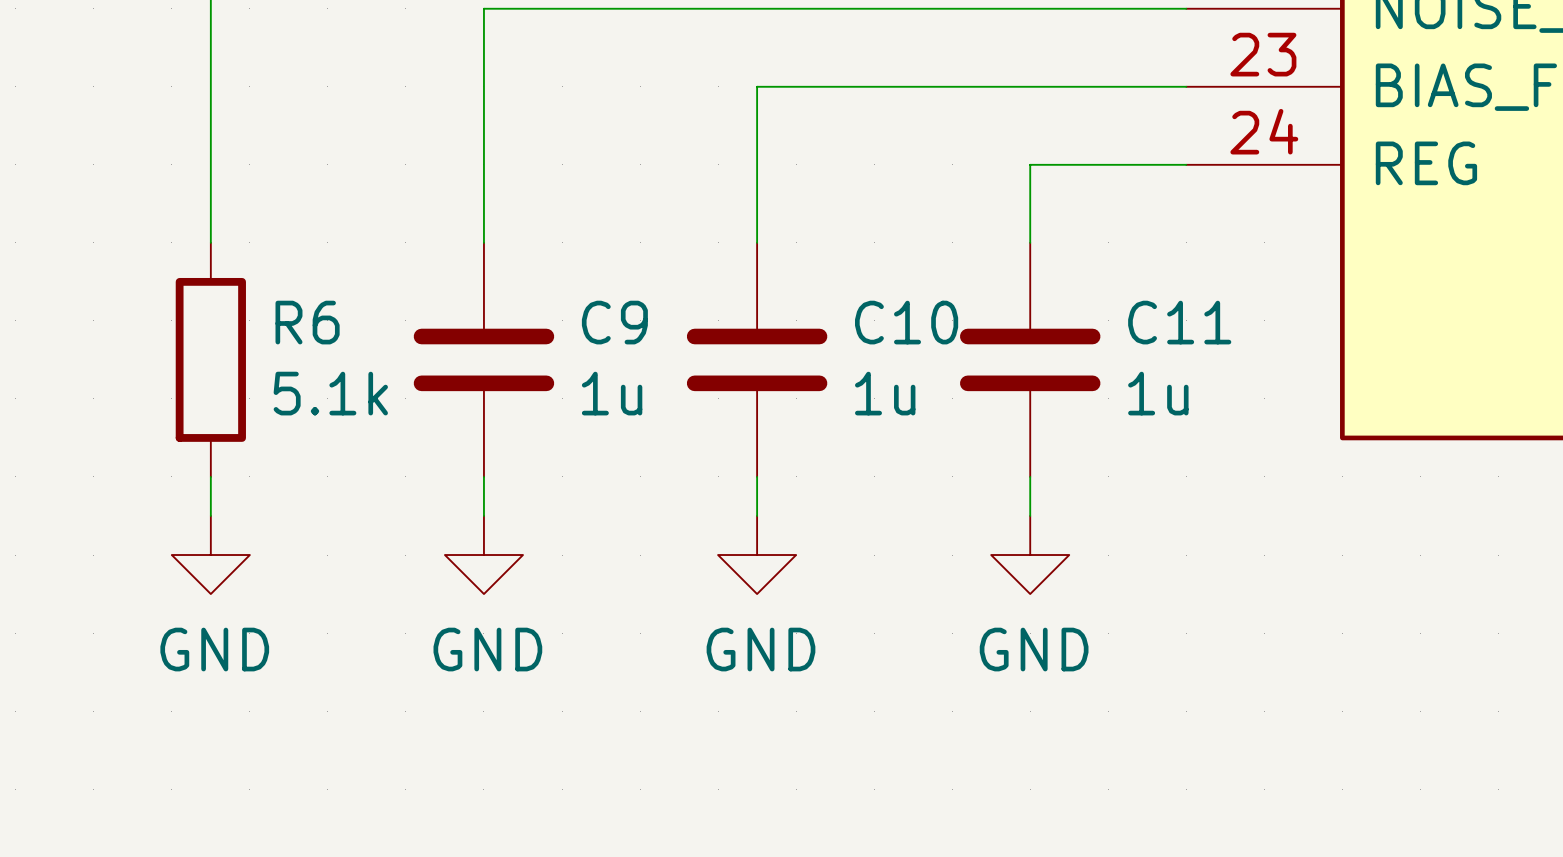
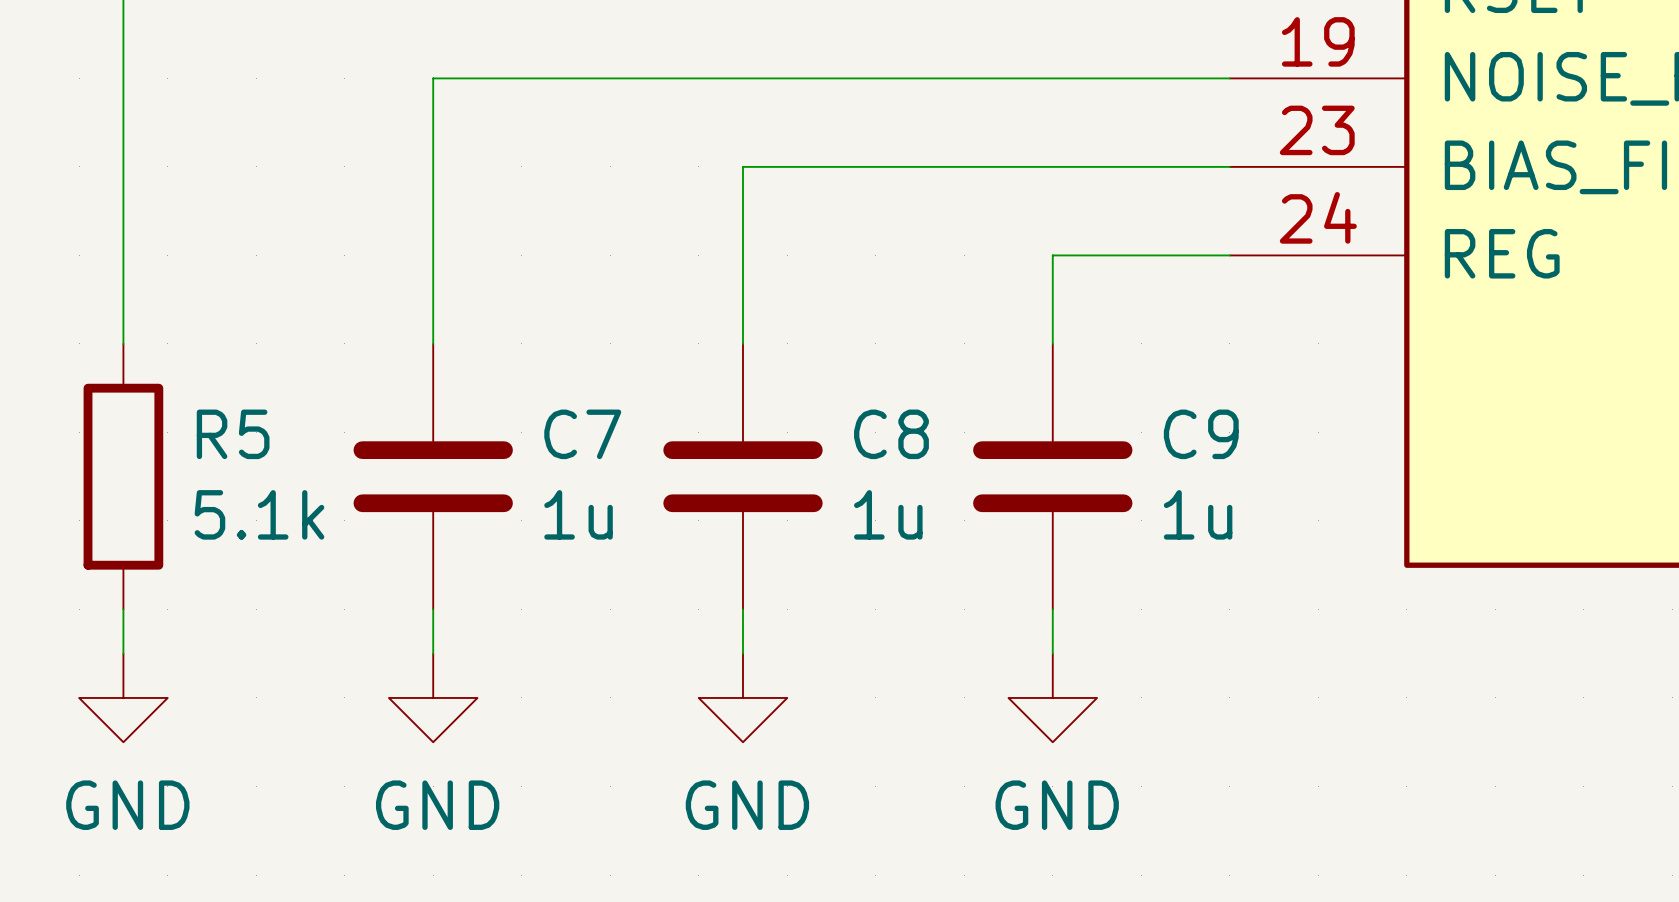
R6 name: R6 (307, 322) -> R5 (233, 434)
C9 name: C9 (614, 322) -> C7 (582, 434)
C10 name: C10 (906, 322) -> C8 (891, 434)
C11 name: C11 (1179, 322) -> C9 (1201, 434)

